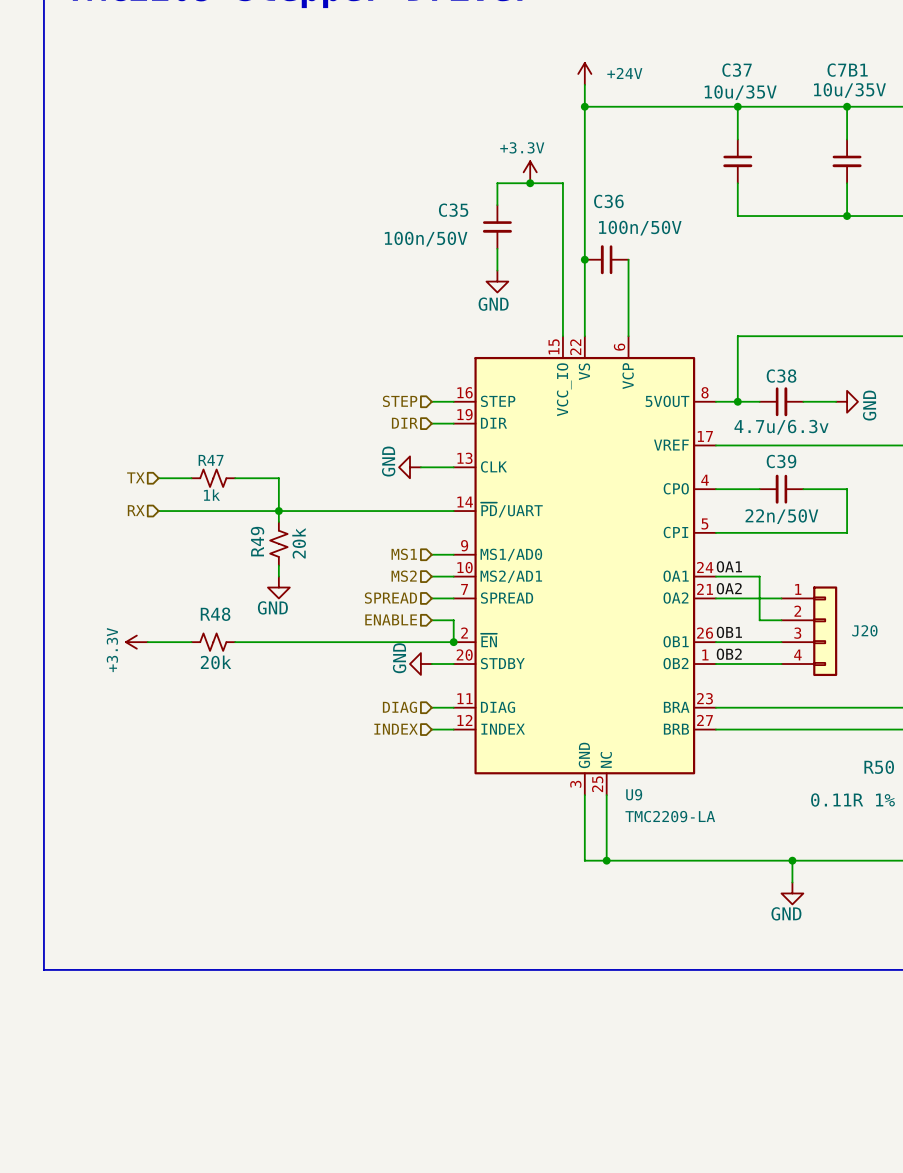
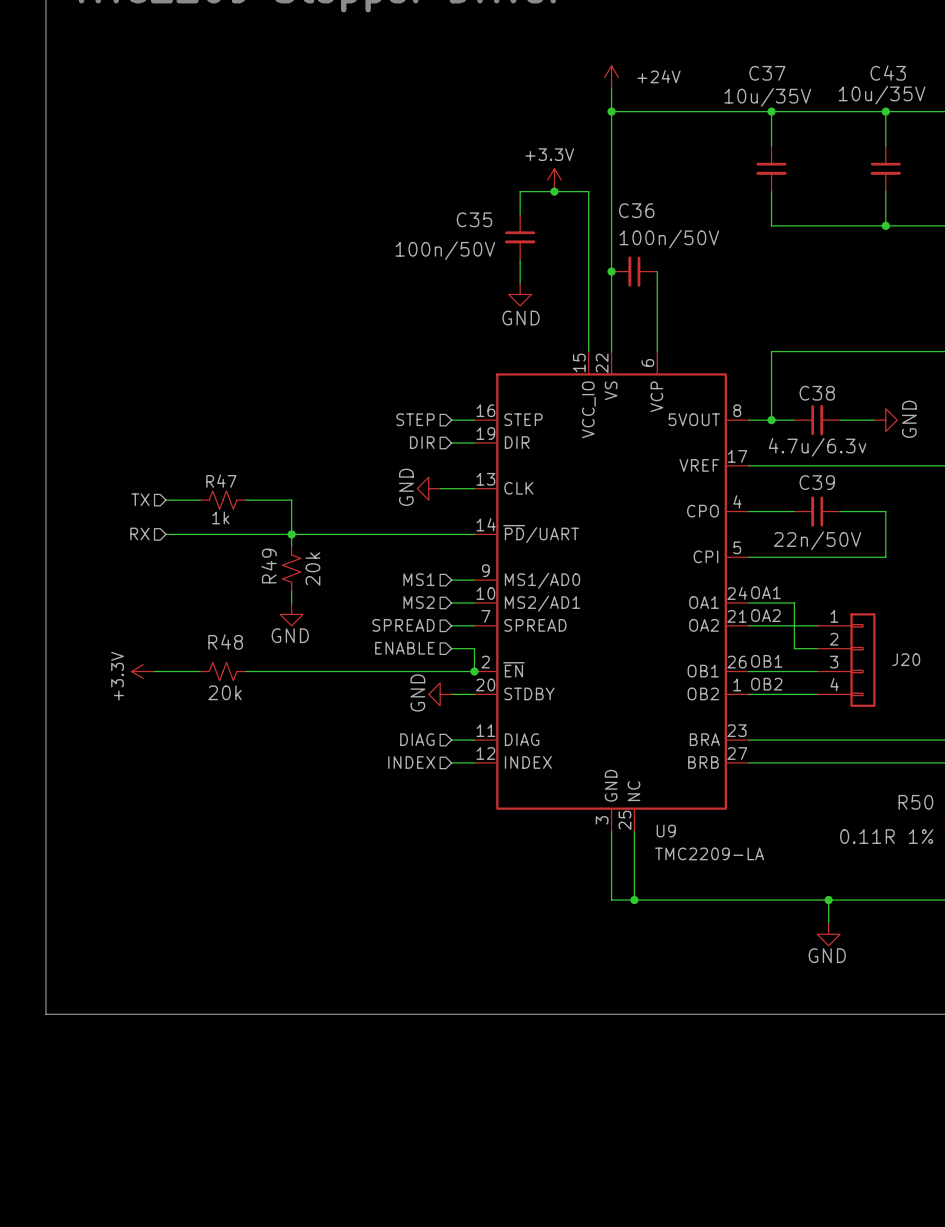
C7B1 name: C7B1 (847, 70) -> C43 (888, 72)

